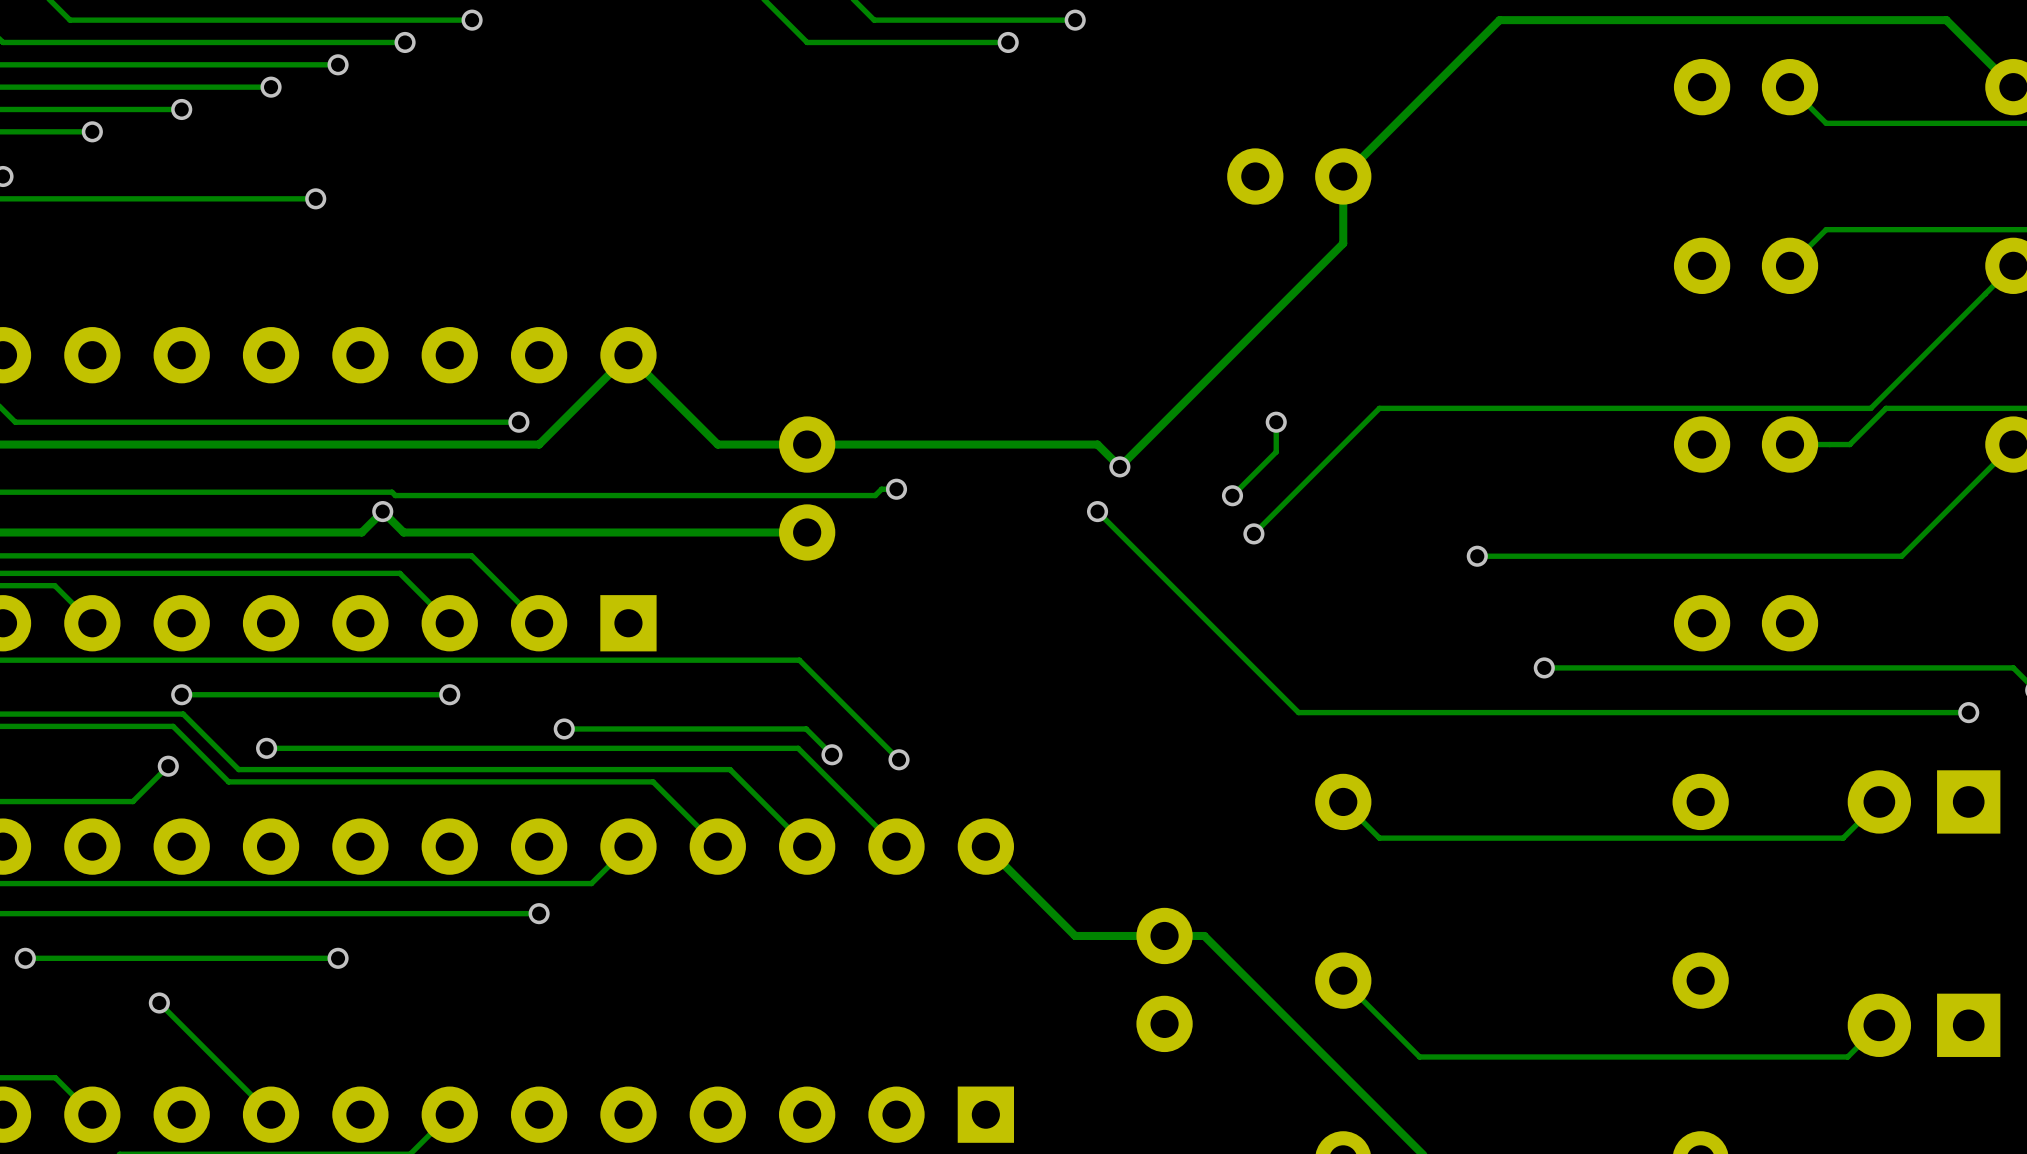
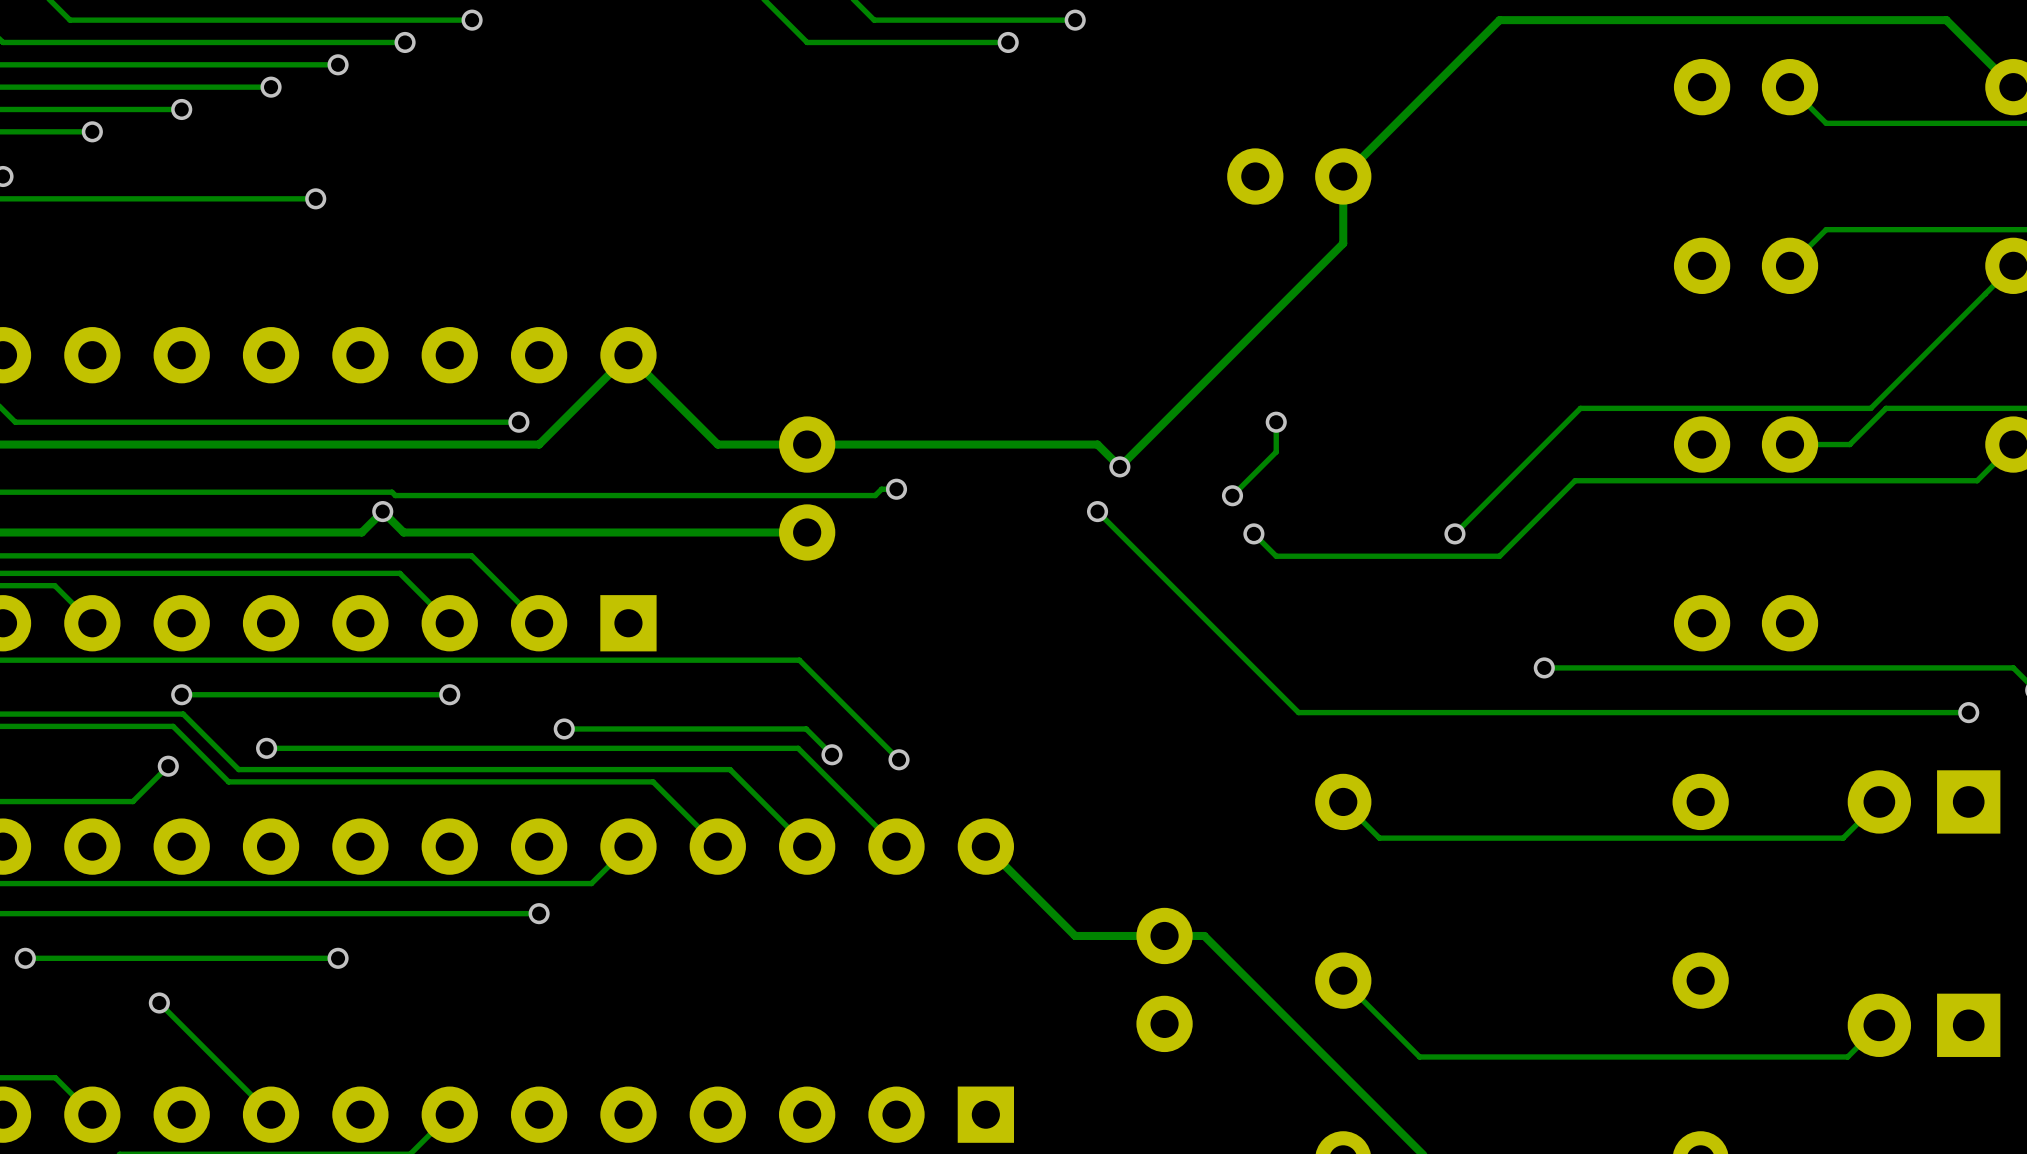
track: (1580, 408) (1379, 408) (1253, 533) -> (1477, 556) (1276, 556) (1253, 533)
track: none -> (1580, 408) (1454, 533)
track: (1977, 480) (1901, 556) (1499, 556) -> (1977, 480) (1575, 480) (1499, 556)
via position: (1477, 556) -> (1454, 533)

